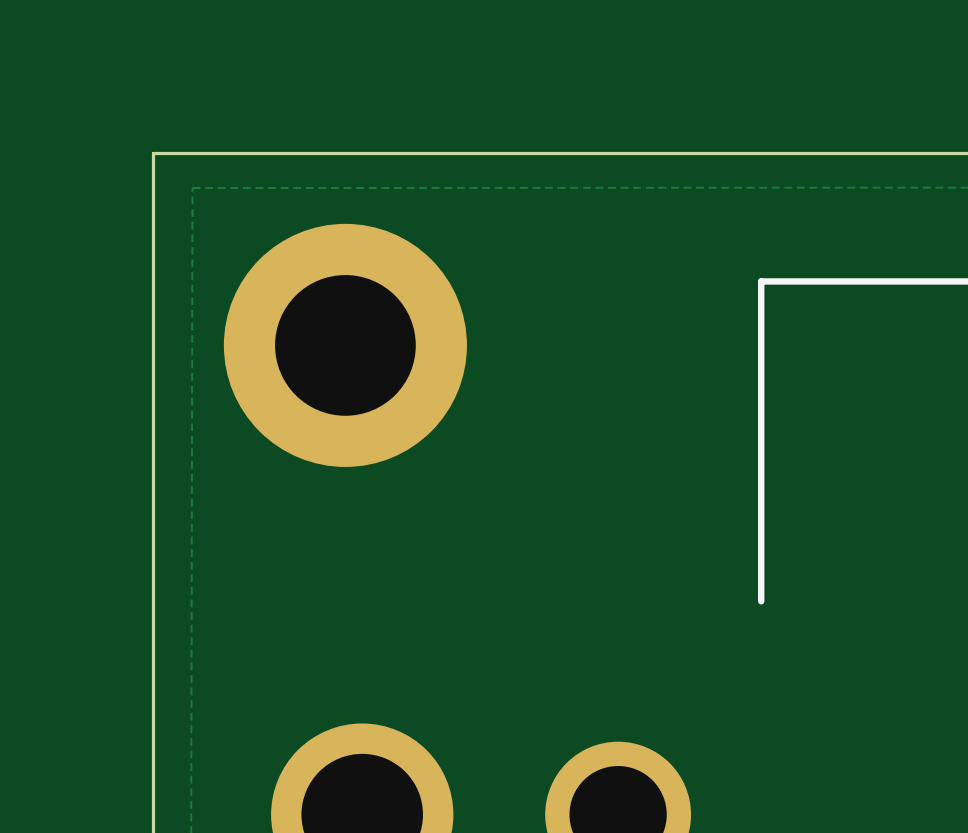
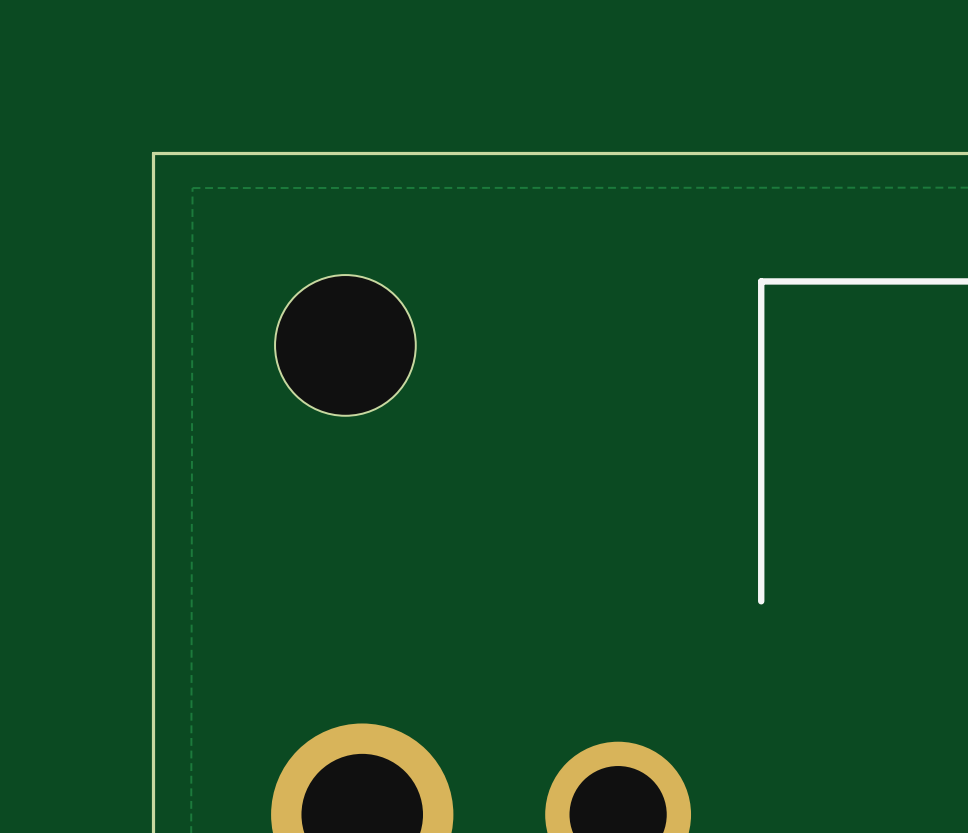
part footprint: [223, 223, 467, 467] -> [275, 275, 416, 416]

